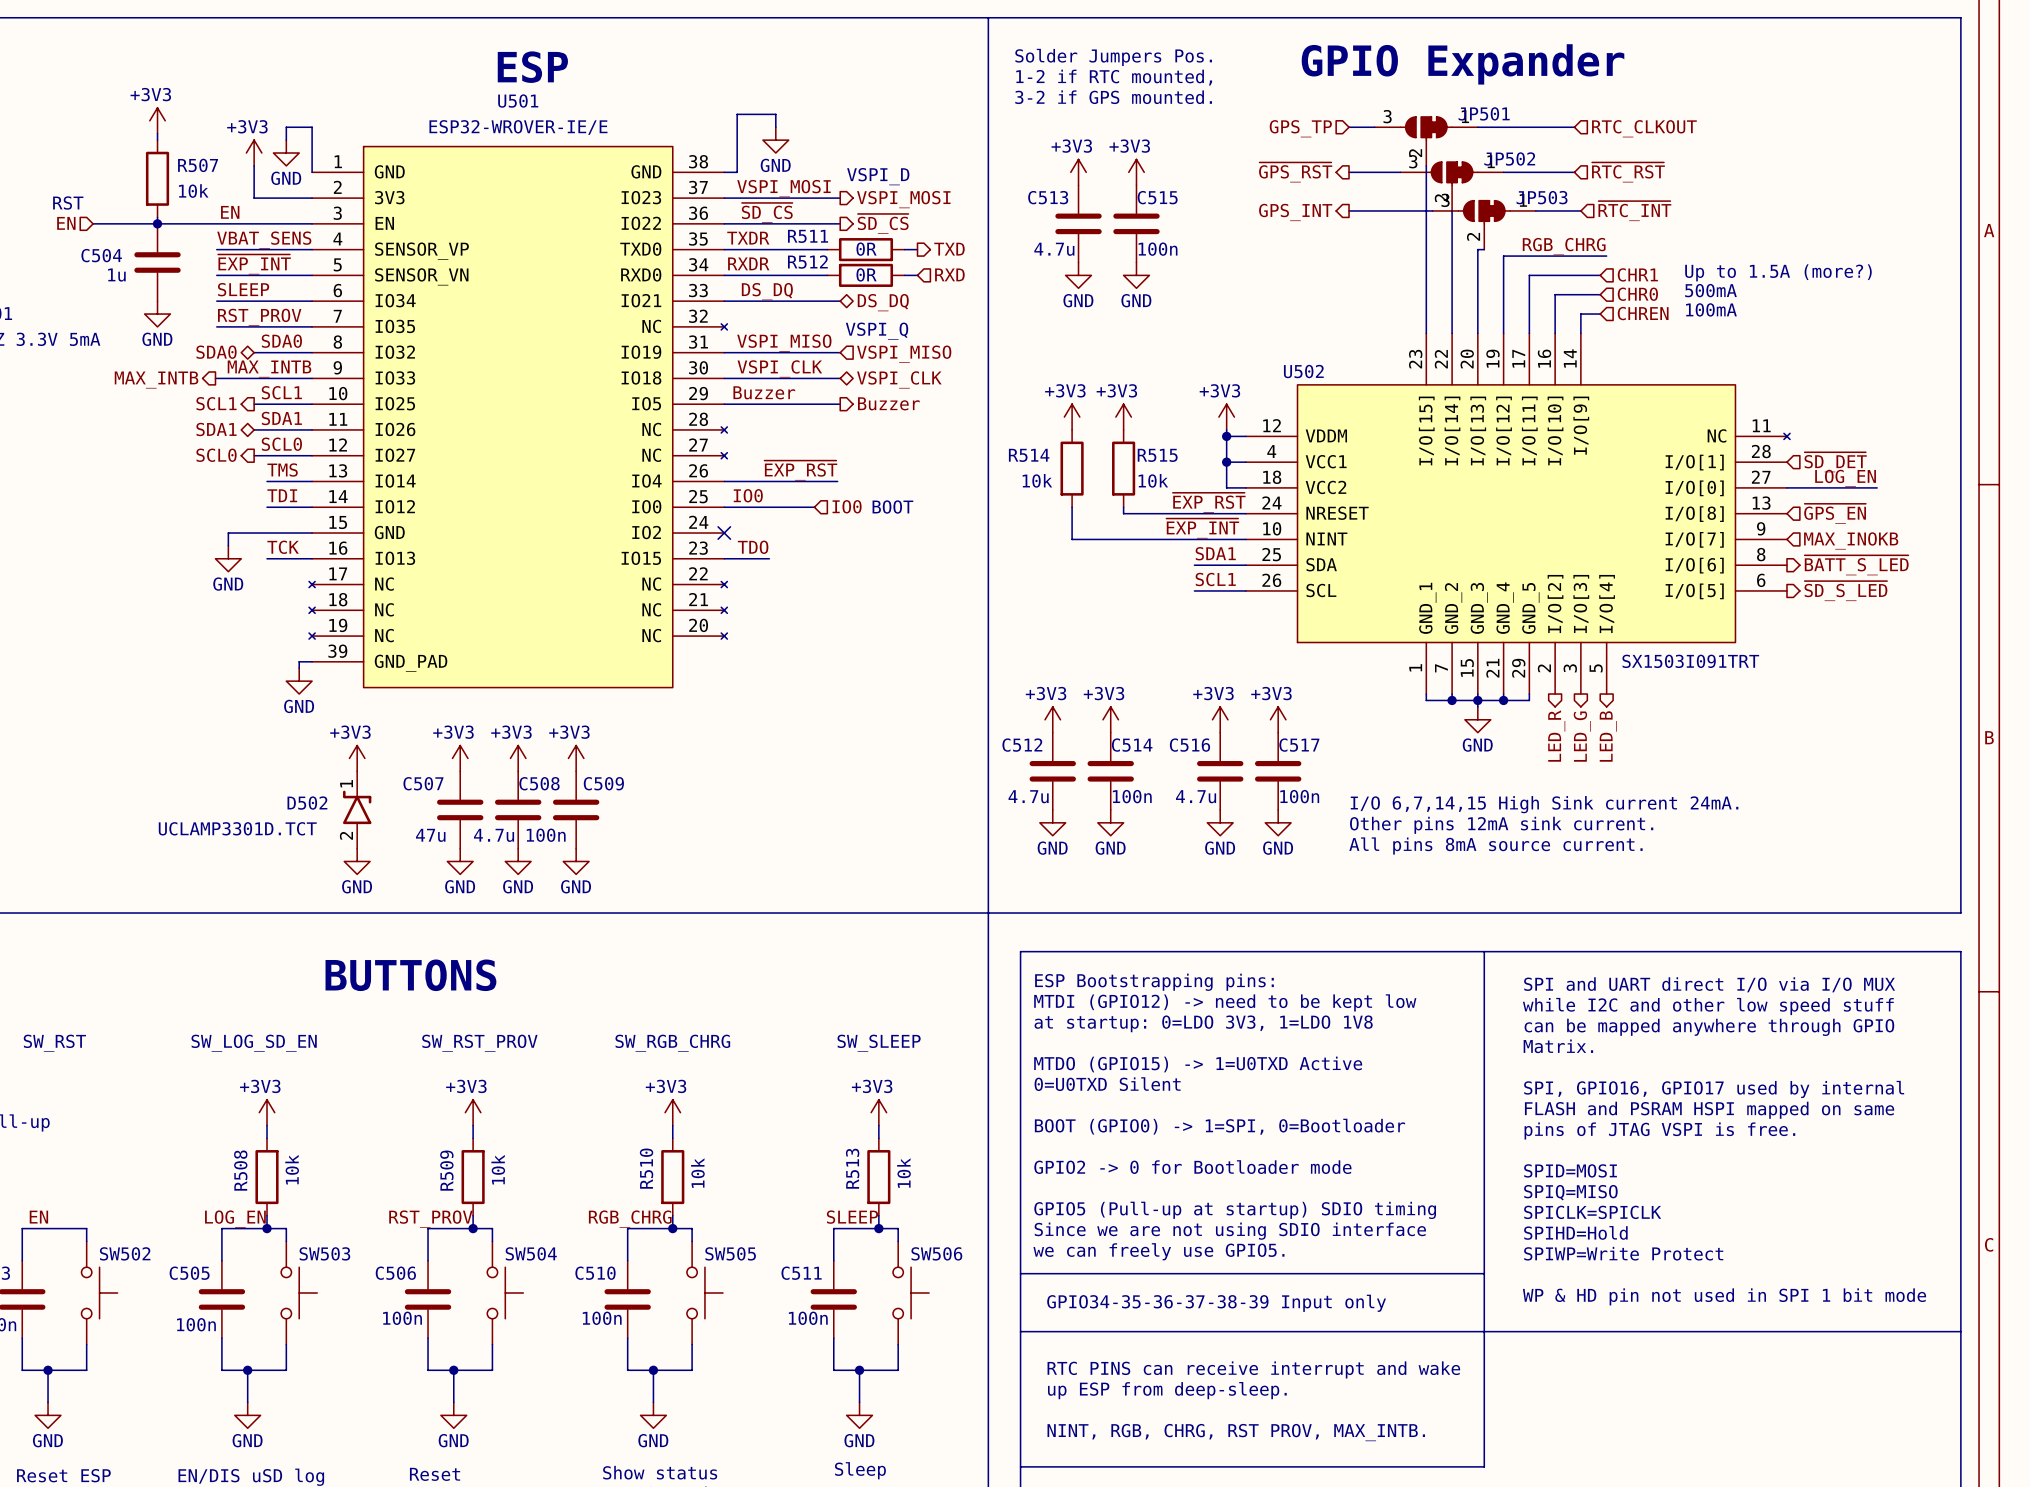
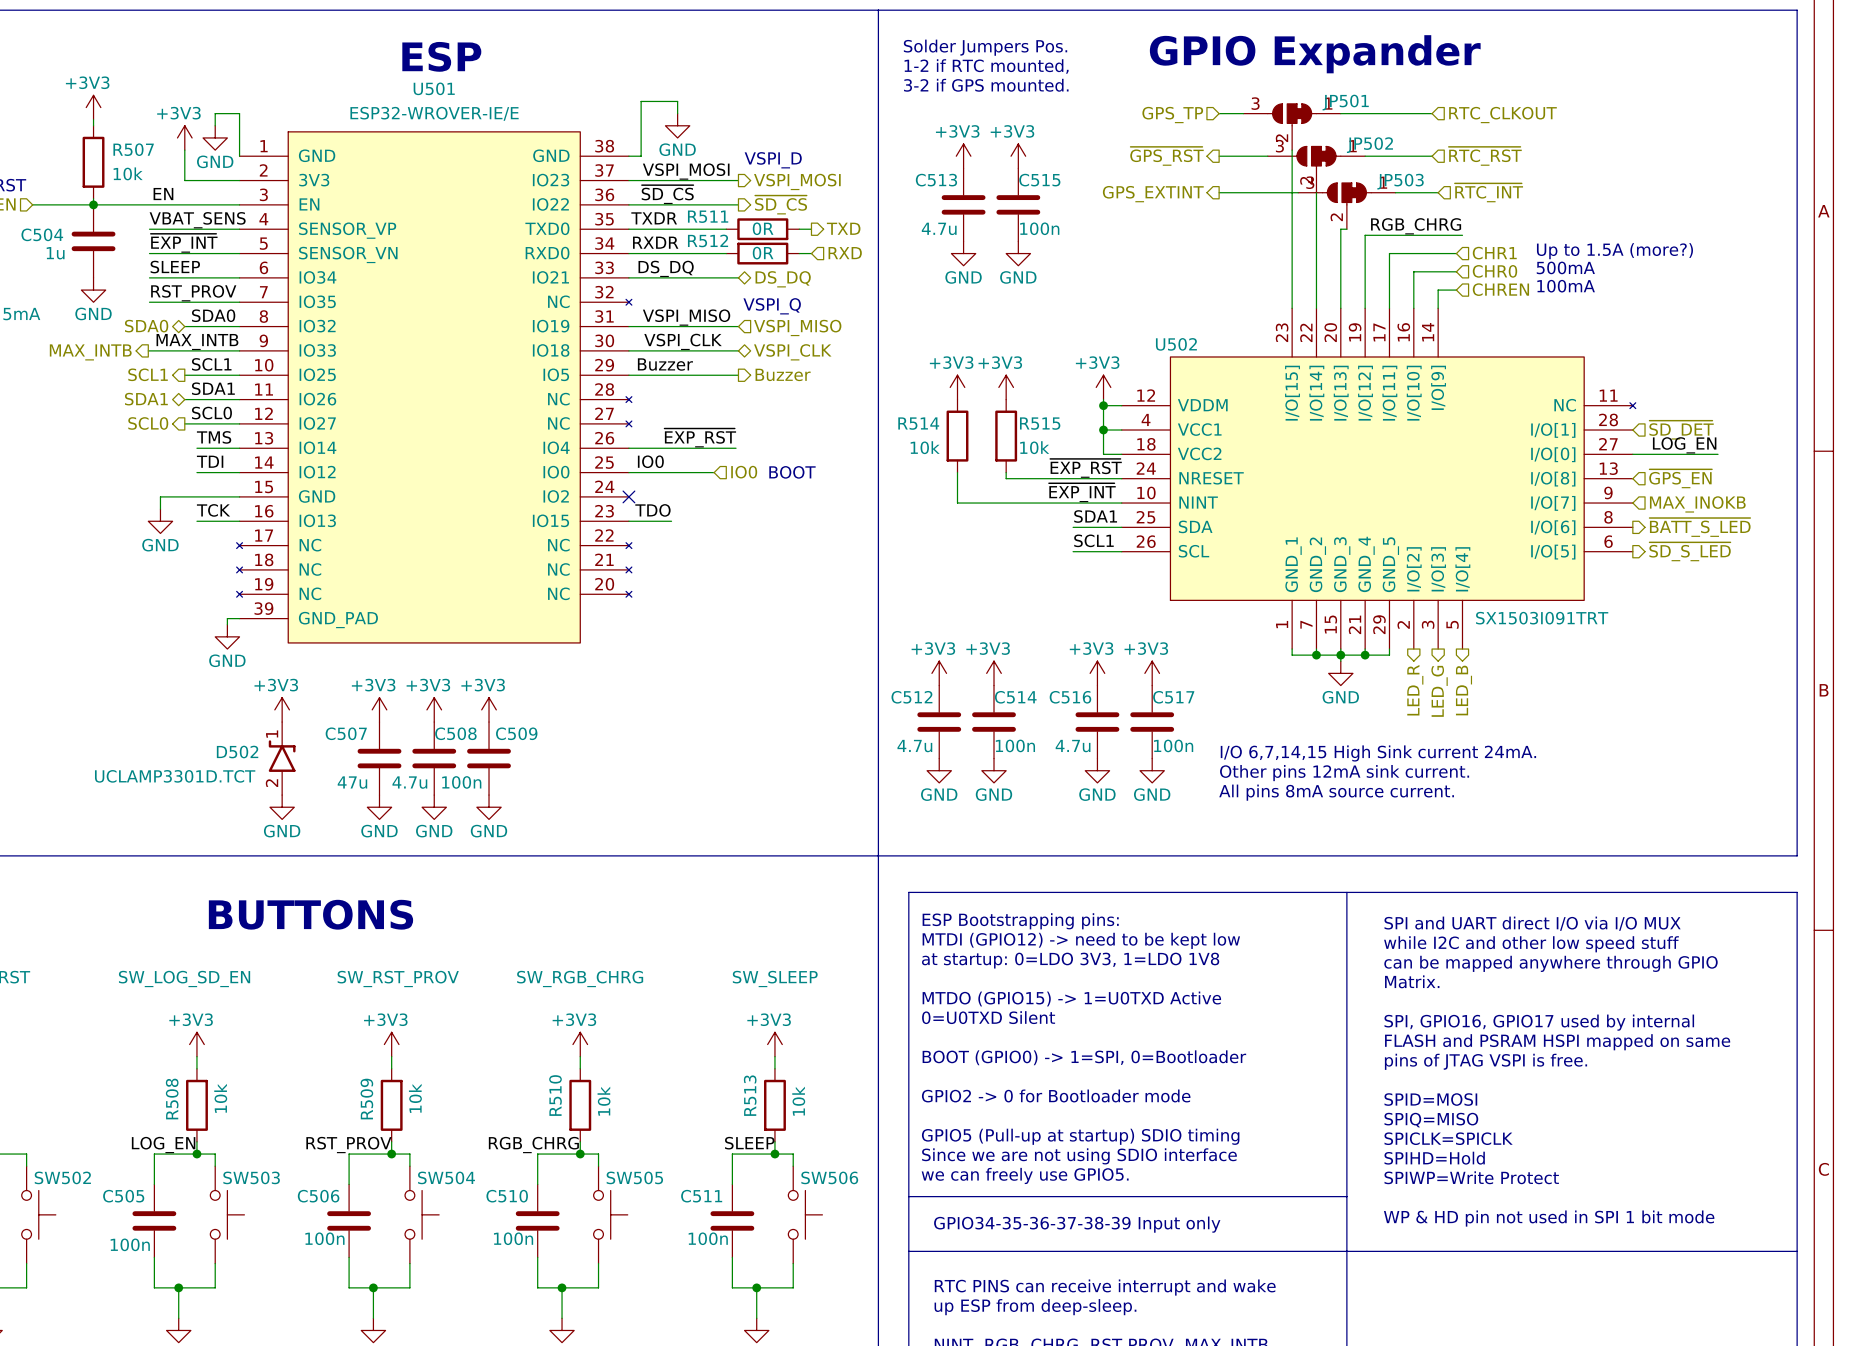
hierarchical label: GPS_INT (1295, 212) -> GPS_EXTINT (1153, 194)

